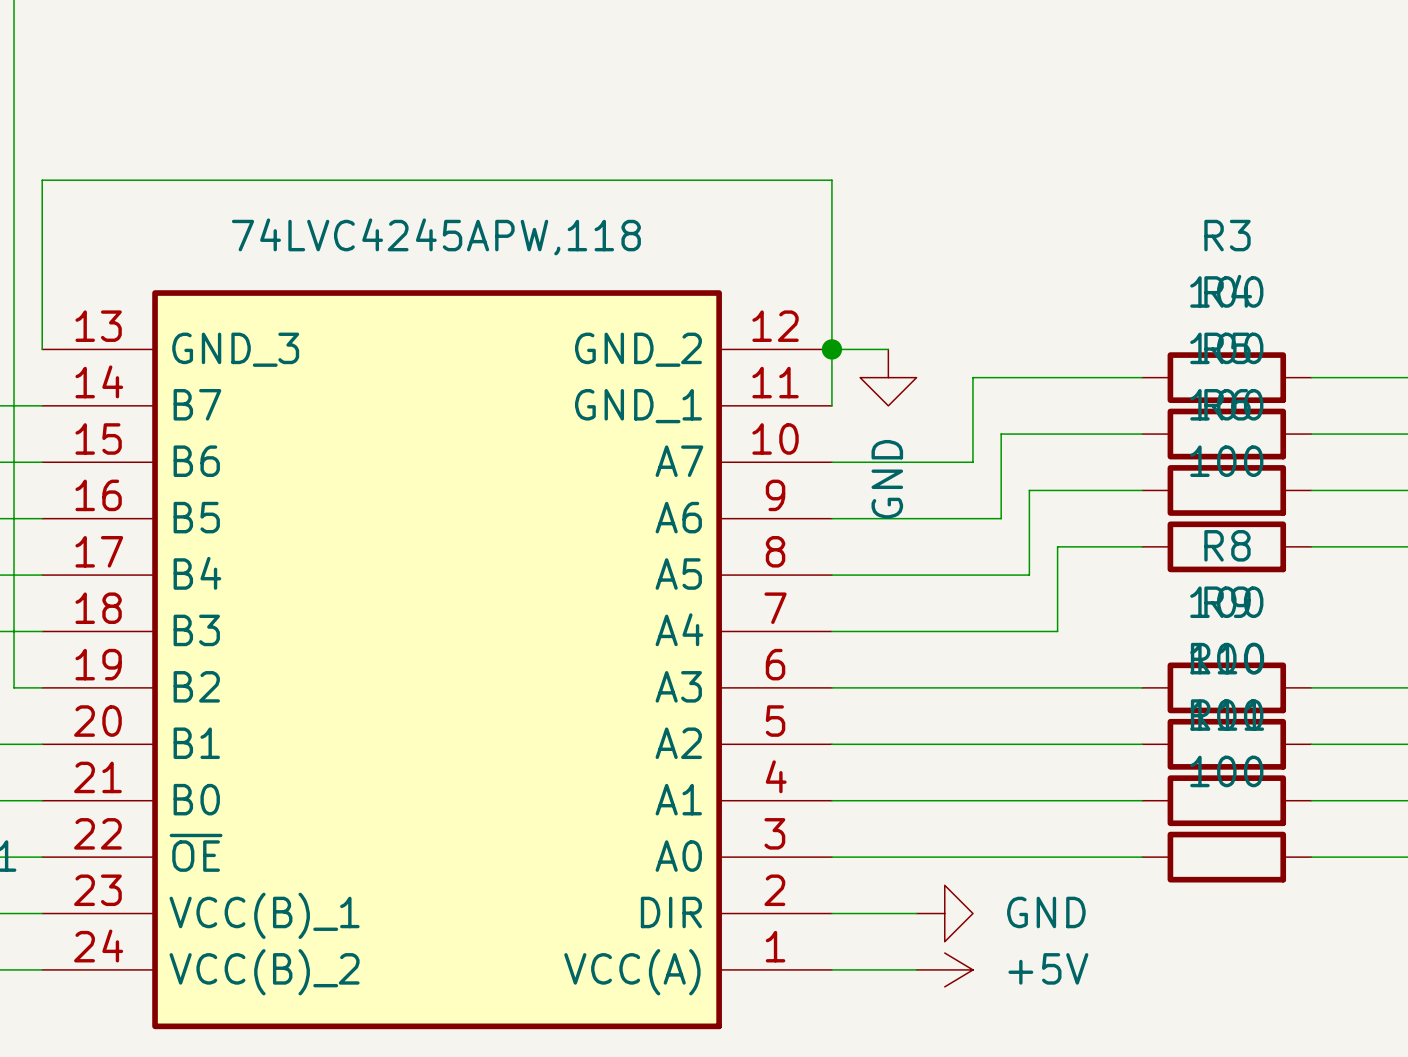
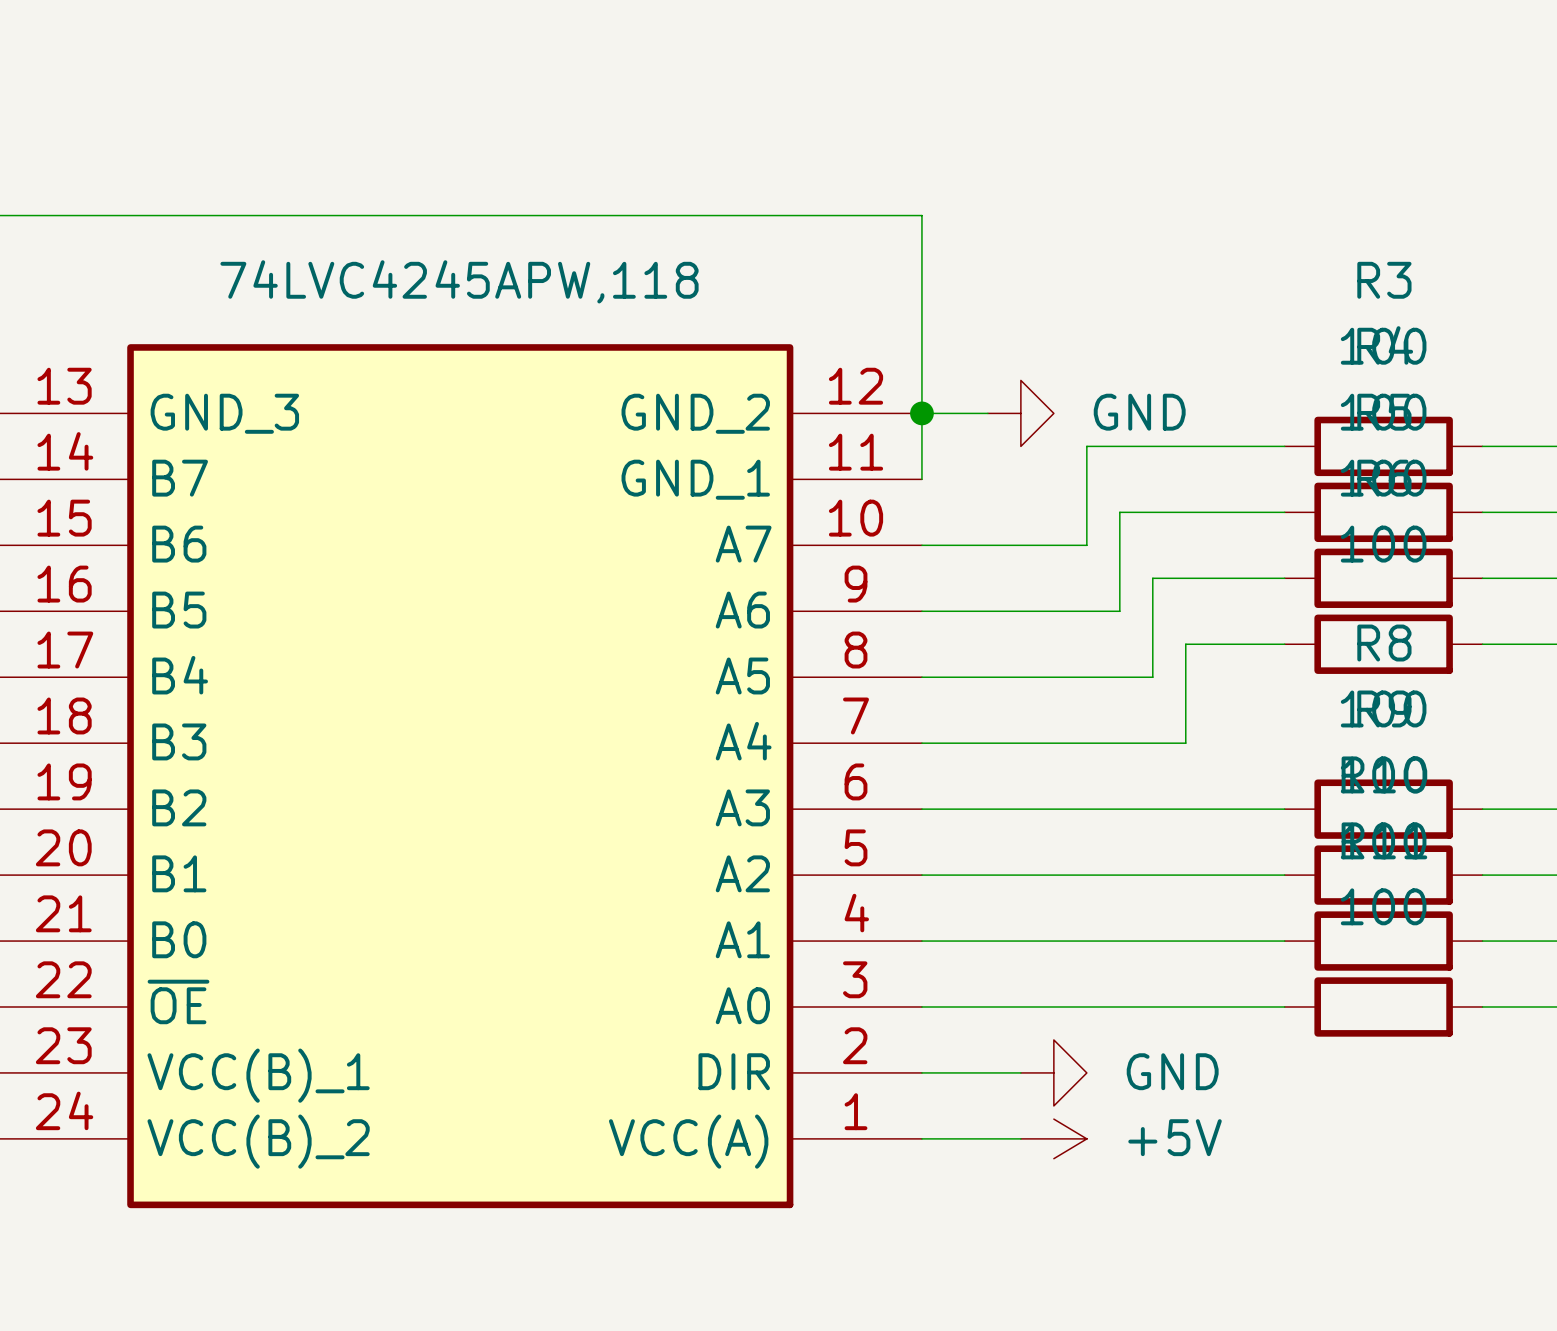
power symbol rotation: 0° (888, 377) -> 90° counterclockwise (1020, 413)
power symbol position: GND (888, 377) -> GND (1020, 413)

